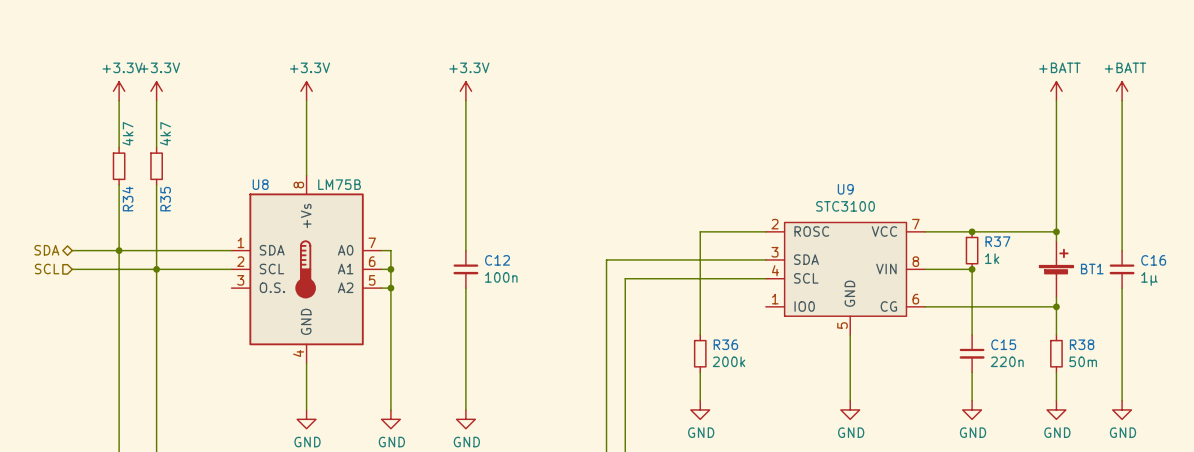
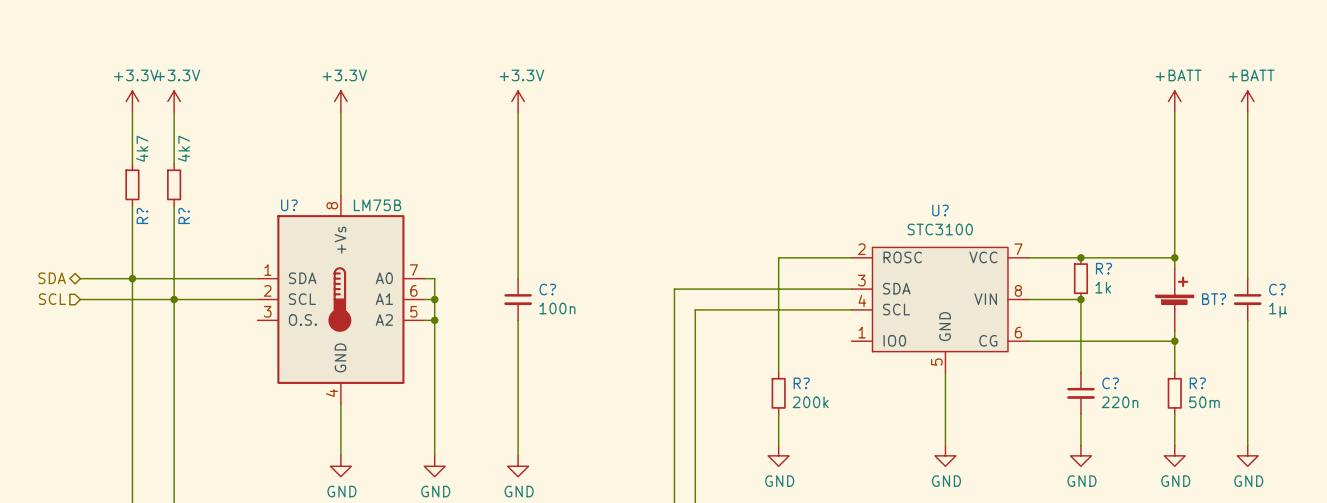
U8 name: U8 (260, 184) -> U? (289, 205)
U9 name: U9 (845, 189) -> U? (940, 210)
R34 name: R34 (127, 198) -> R? (142, 215)
R35 name: R35 (165, 199) -> R? (184, 215)
R37 name: R37 (997, 241) -> R? (1103, 268)
C12 name: C12 (497, 260) -> C? (547, 289)
C16 name: C16 (1153, 260) -> C? (1277, 289)
BT1 name: BT1 (1092, 269) -> BT? (1214, 299)
R36 name: R36 (725, 344) -> R? (801, 383)
C15 name: C15 (1003, 344) -> C? (1110, 383)
R38 name: R38 (1082, 344) -> R? (1197, 383)

